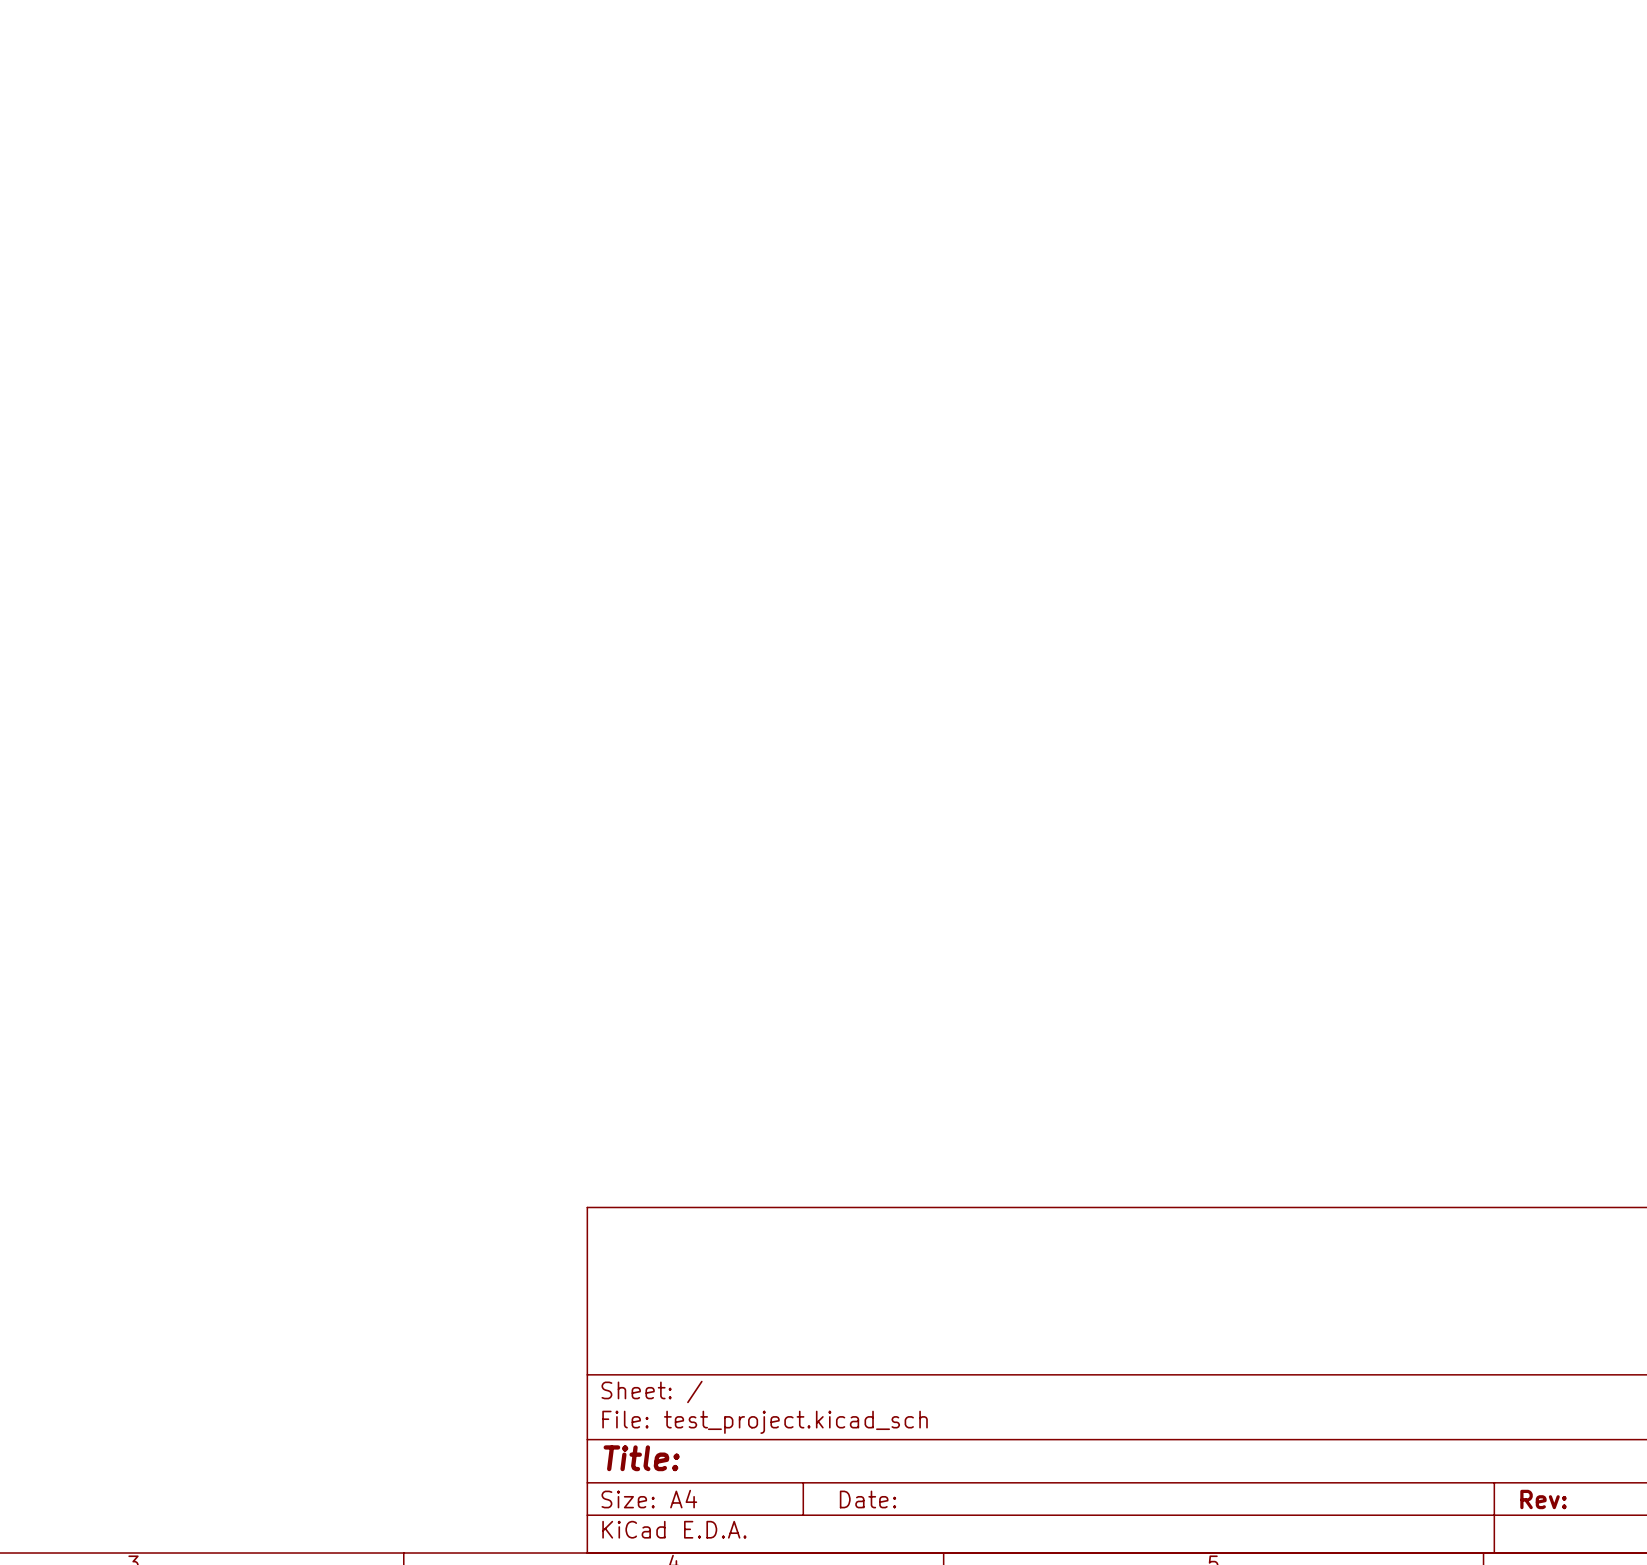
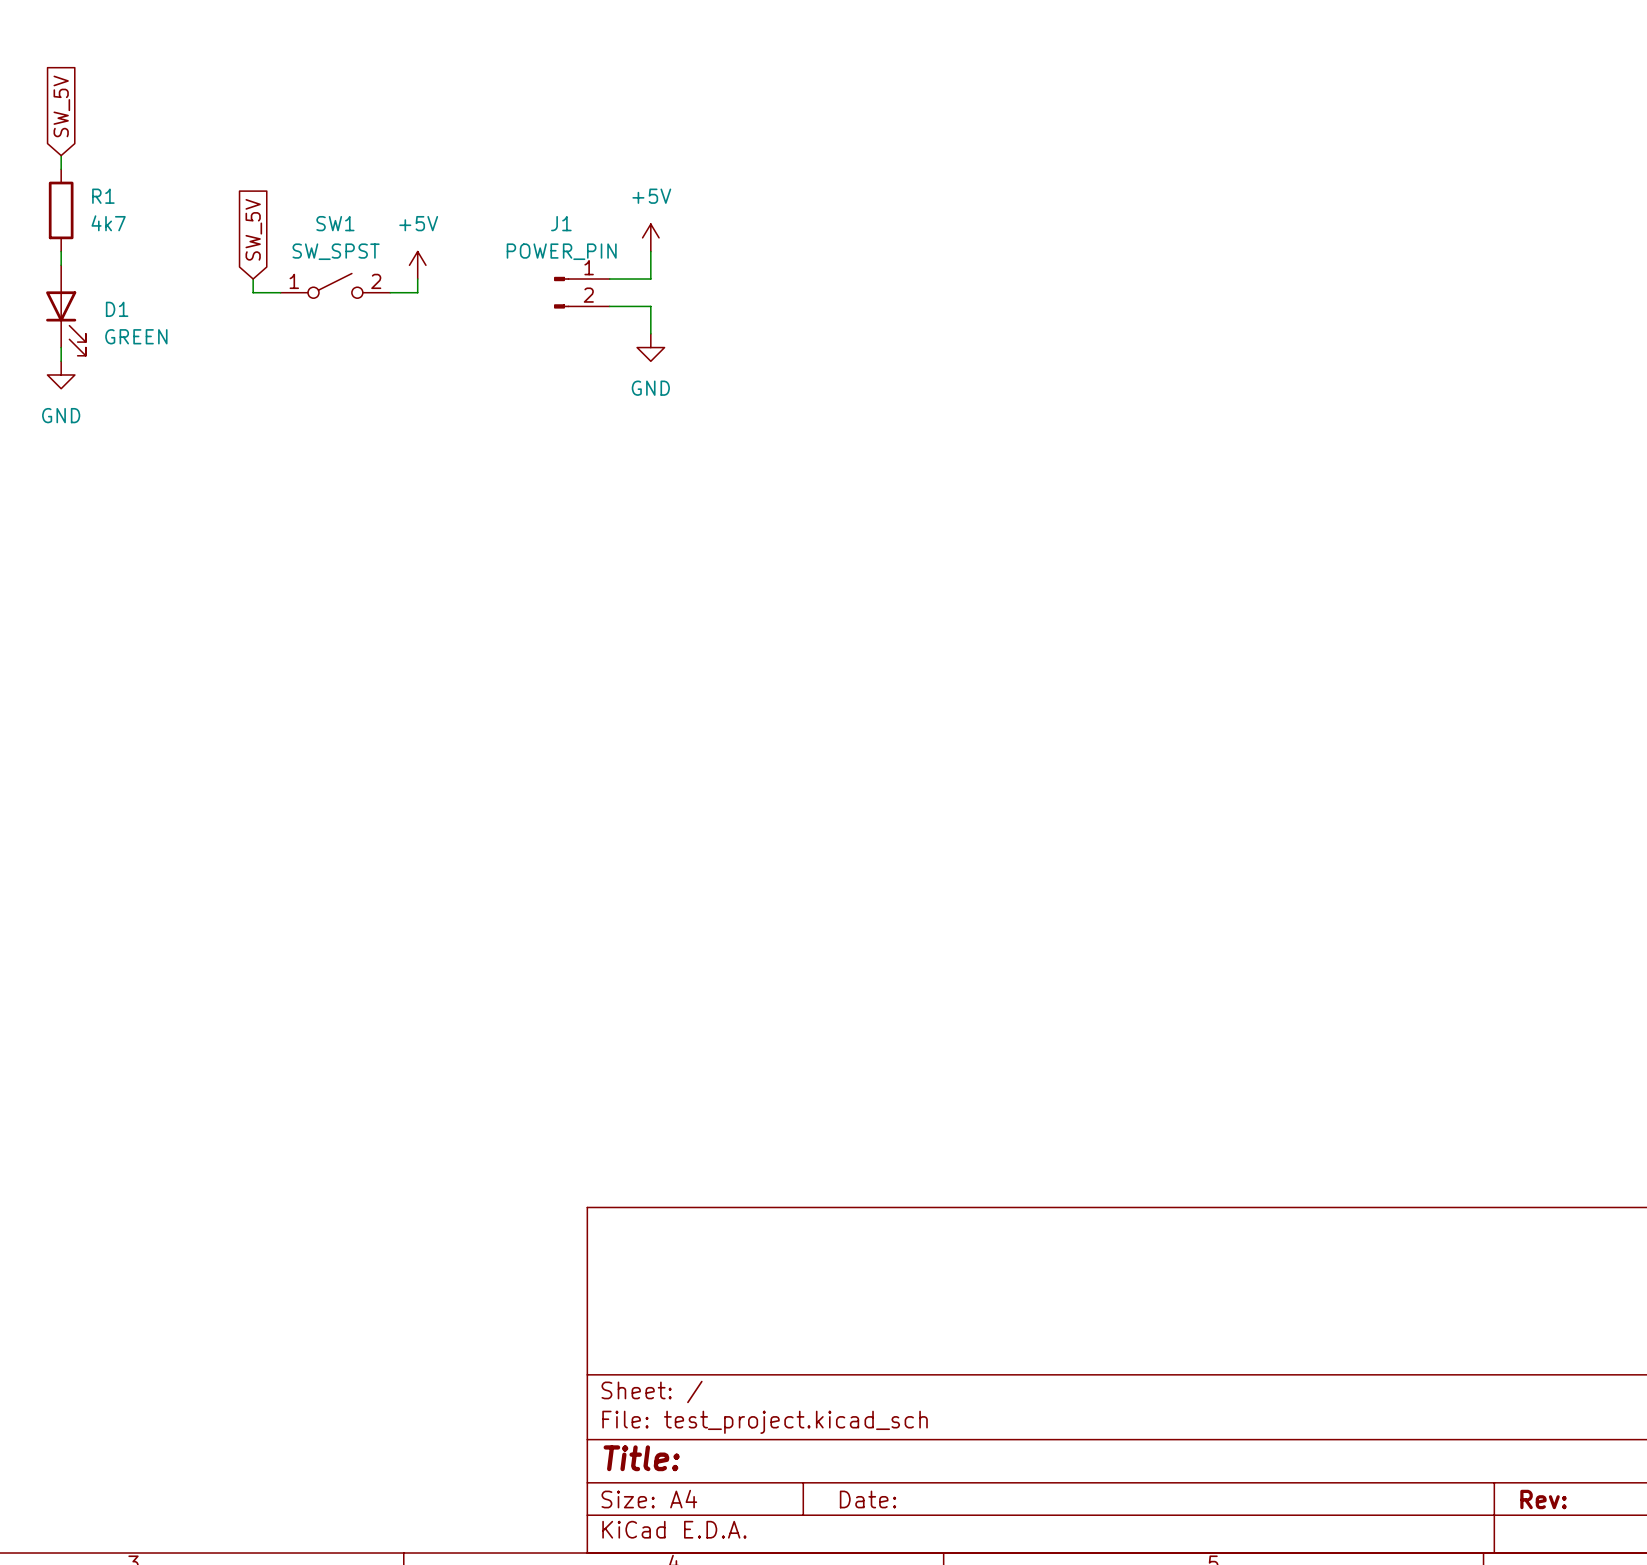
global label: none -> SW_5V (61, 106)
wire: none -> (61, 155) (61, 169)
R1: none -> 4k7 (61, 210)
global label: none -> SW_5V (253, 229)
power symbol: none -> +5V (650, 237)
wire: none -> (61, 251) (61, 265)
wire: none -> (650, 251) (650, 279) (609, 279)
power symbol: none -> +5V (417, 265)
wire: none -> (253, 279) (253, 292) (280, 292)
wire: none -> (417, 279) (417, 292) (390, 292)
SW1: none -> SW_SPST (335, 285)
J1: none -> POWER_PIN (581, 292)
wire: none -> (609, 306) (650, 306) (650, 333)
D1: none -> GREEN (65, 310)
wire: none -> (61, 347) (61, 361)
power symbol: none -> GND (650, 347)
power symbol: none -> GND (61, 374)

